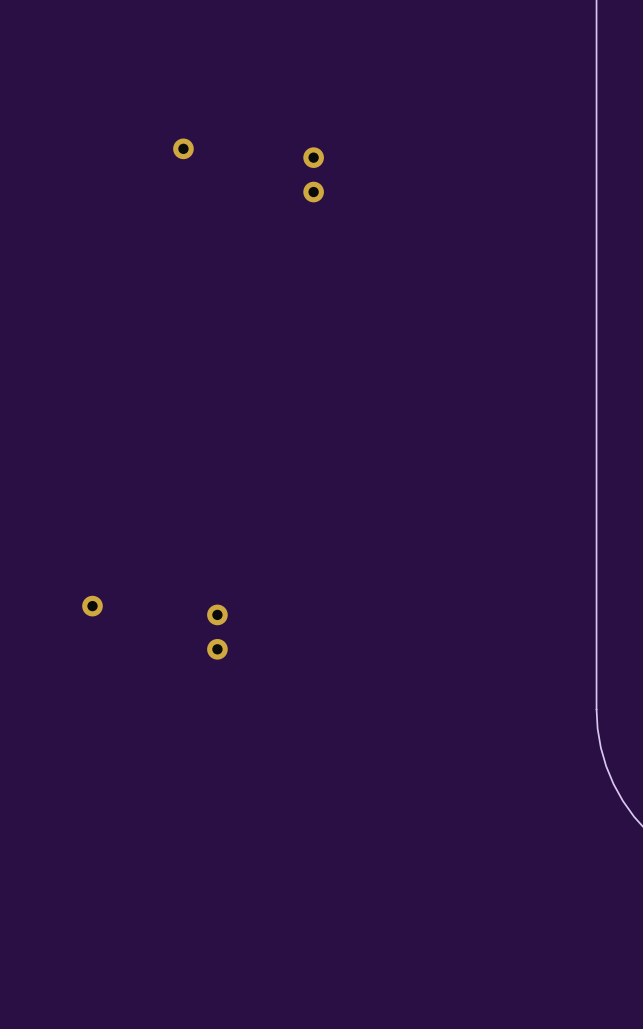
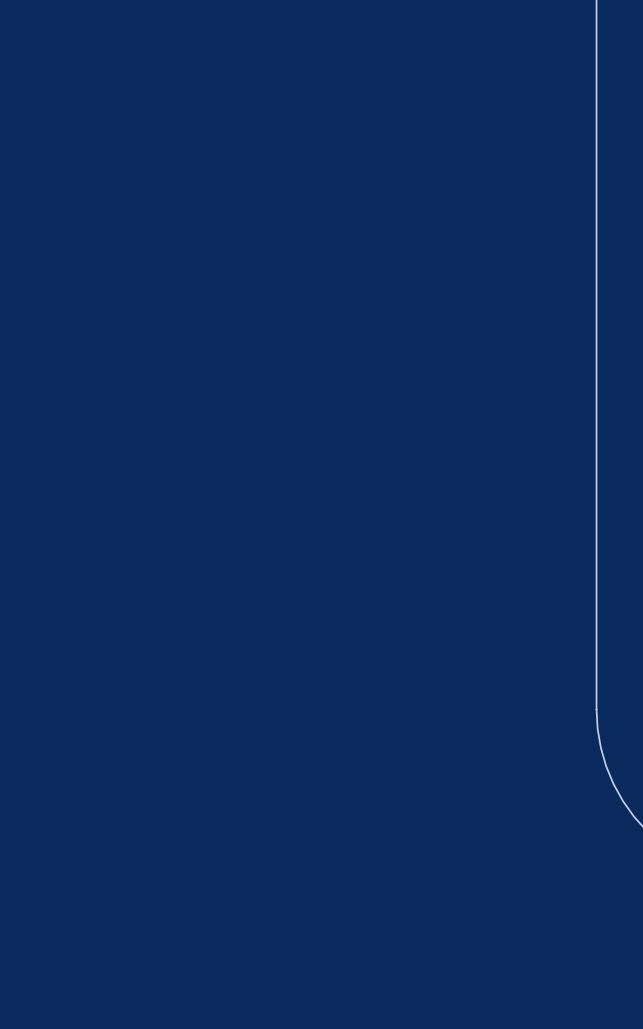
via: (183, 148) -> none
via: (313, 157) -> none
via: (313, 192) -> none
via: (92, 606) -> none
via: (217, 614) -> none
via: (217, 649) -> none

